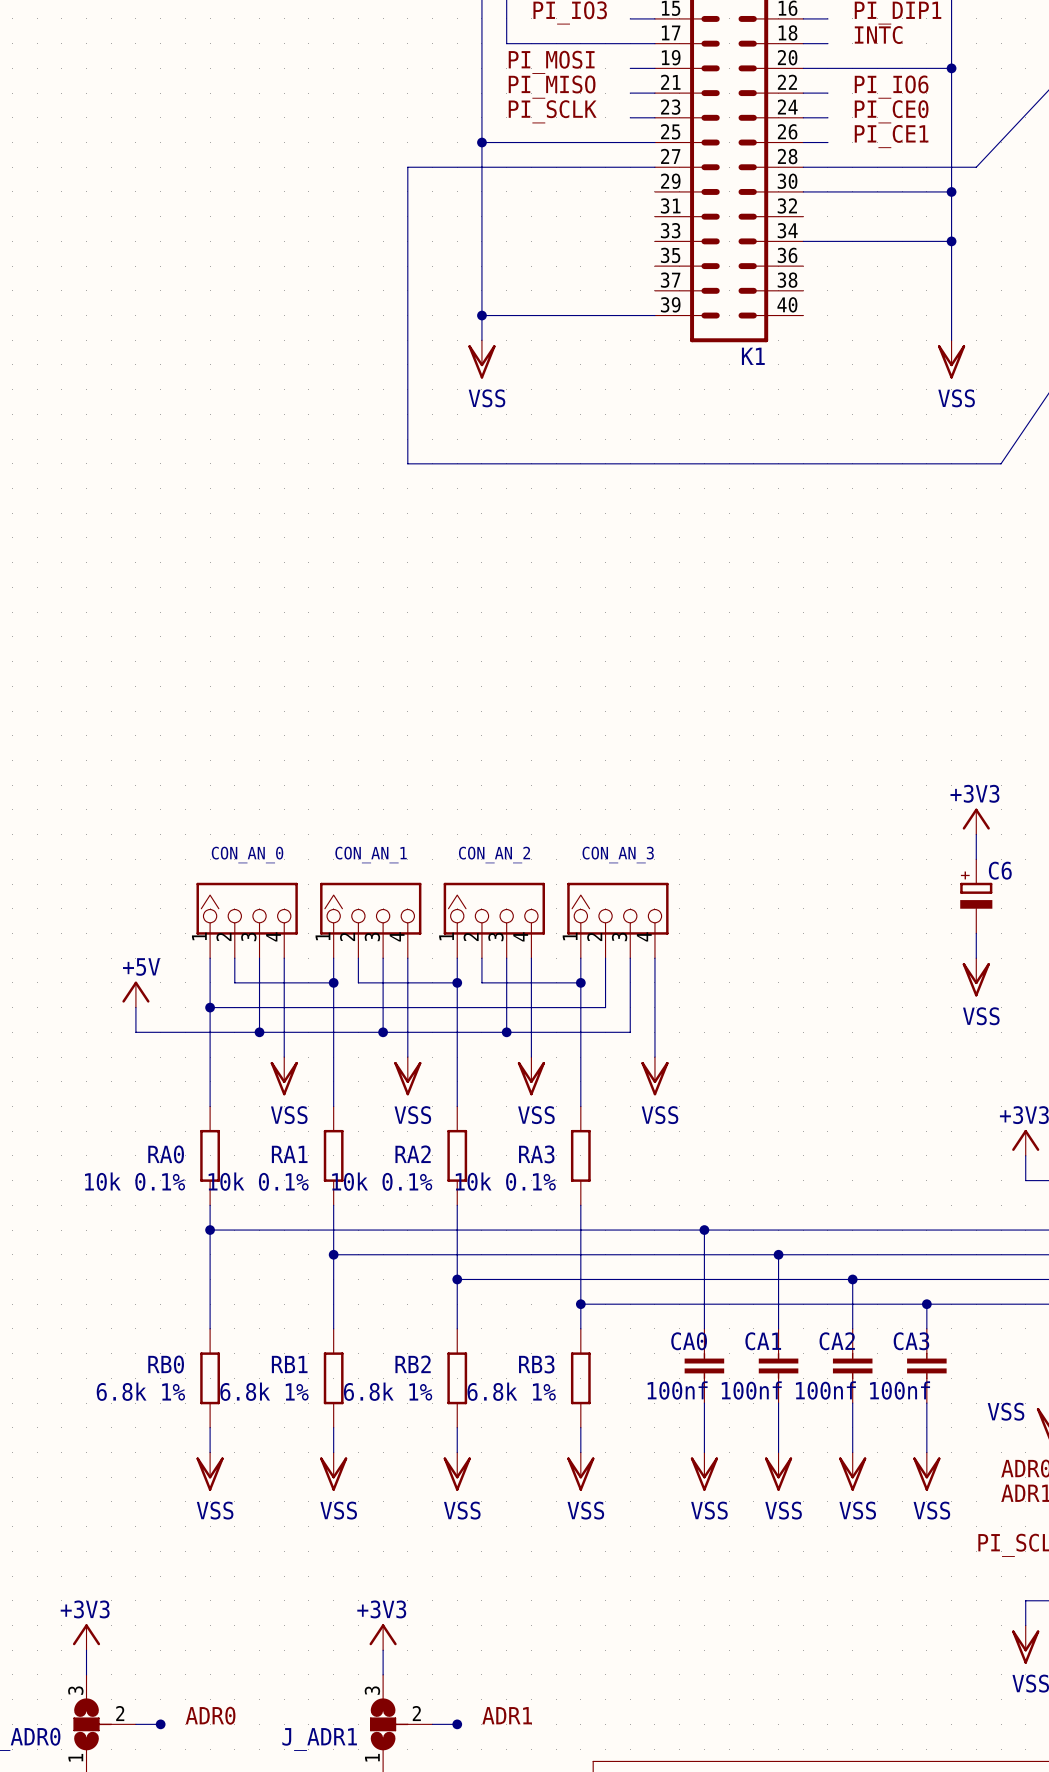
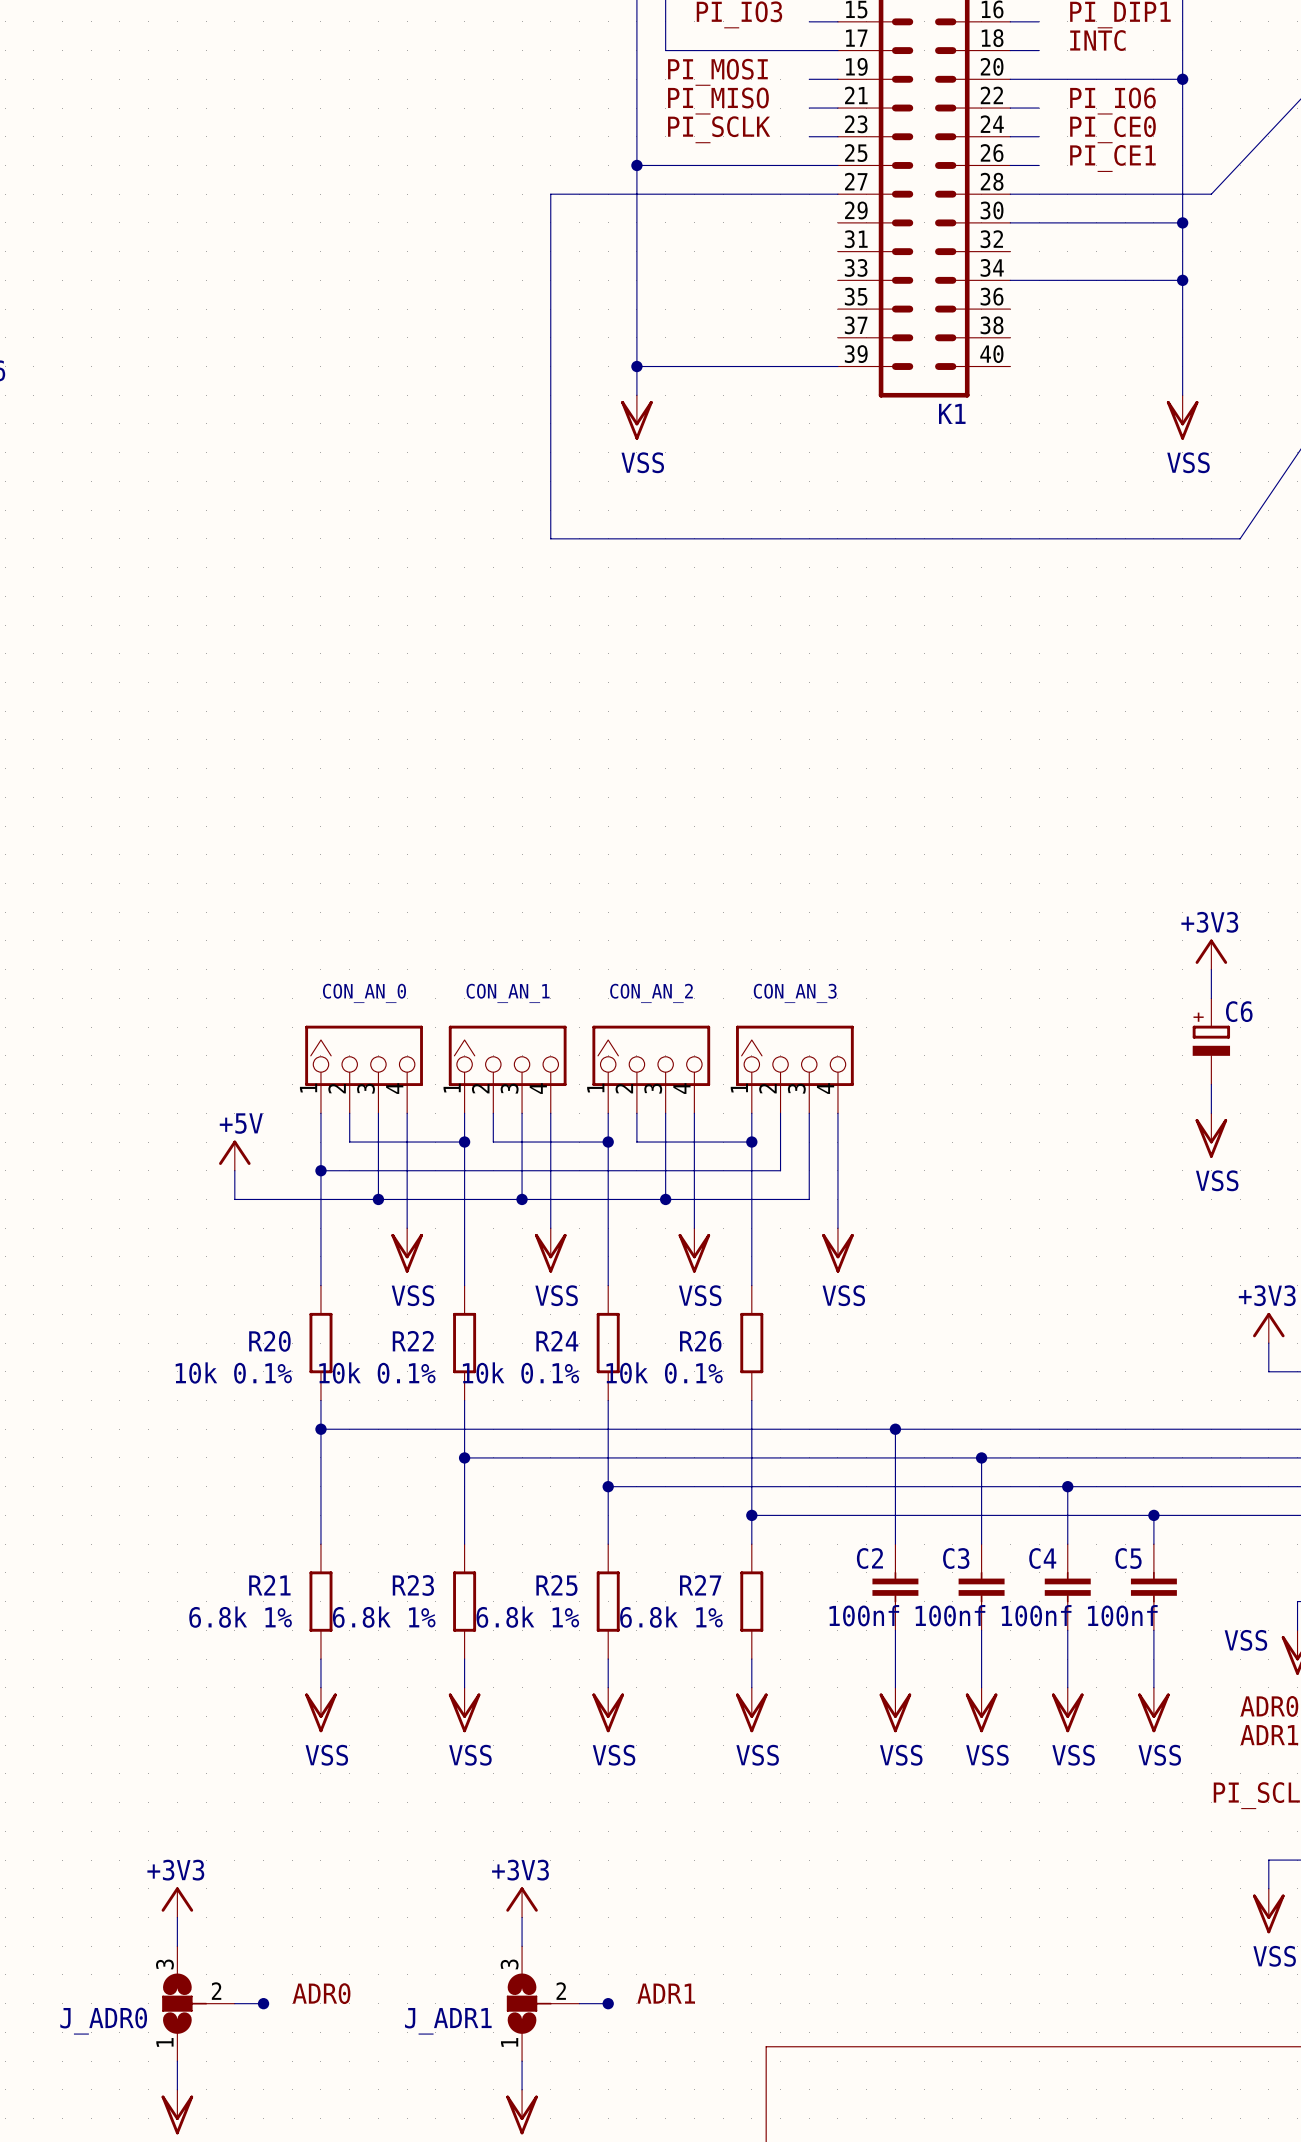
RA0 name: RA0 (166, 1154) -> R20 (269, 1341)
RA1 name: RA1 (289, 1154) -> R22 (413, 1341)
RA2 name: RA2 (413, 1154) -> R24 (557, 1341)
RA3 name: RA3 (536, 1154) -> R26 (700, 1341)
CA0 name: CA0 (689, 1341) -> C2 (869, 1558)
CA1 name: CA1 (763, 1341) -> C3 (956, 1558)
CA2 name: CA2 (837, 1341) -> C4 (1042, 1558)
CA3 name: CA3 (911, 1341) -> C5 (1128, 1558)
RB0 name: RB0 (166, 1364) -> R21 (269, 1585)
RB1 name: RB1 (289, 1364) -> R23 (413, 1585)
RB2 name: RB2 (413, 1364) -> R25 (556, 1585)
RB3 name: RB3 (536, 1364) -> R27 (700, 1585)

